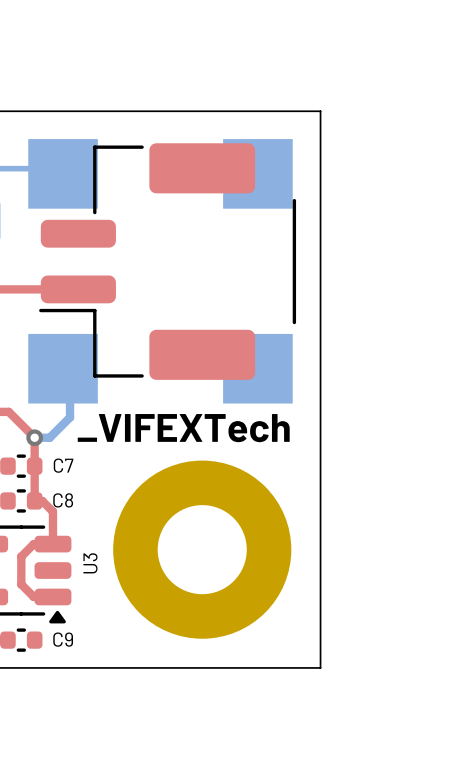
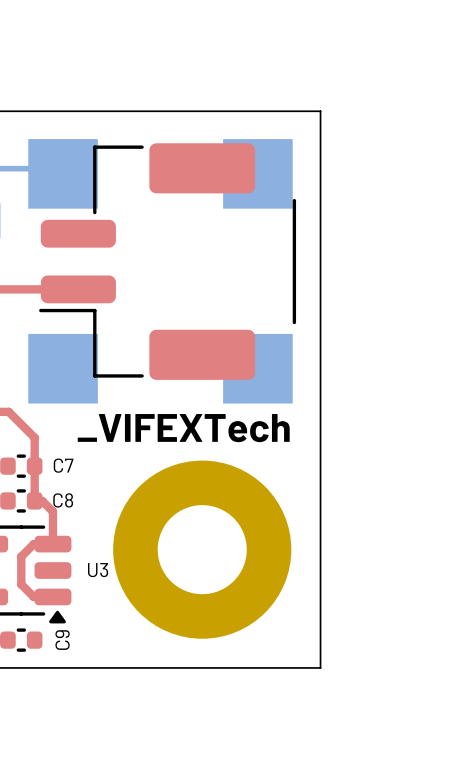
bottom track: (70, 361) (70, 417) (49, 437) (34, 437) -> none
via: (34, 437) -> none
U3 name rotation: 0° (90, 563) -> 90° clockwise (98, 570)
C9 name rotation: 0° (63, 639) -> 90° counterclockwise (62, 640)

